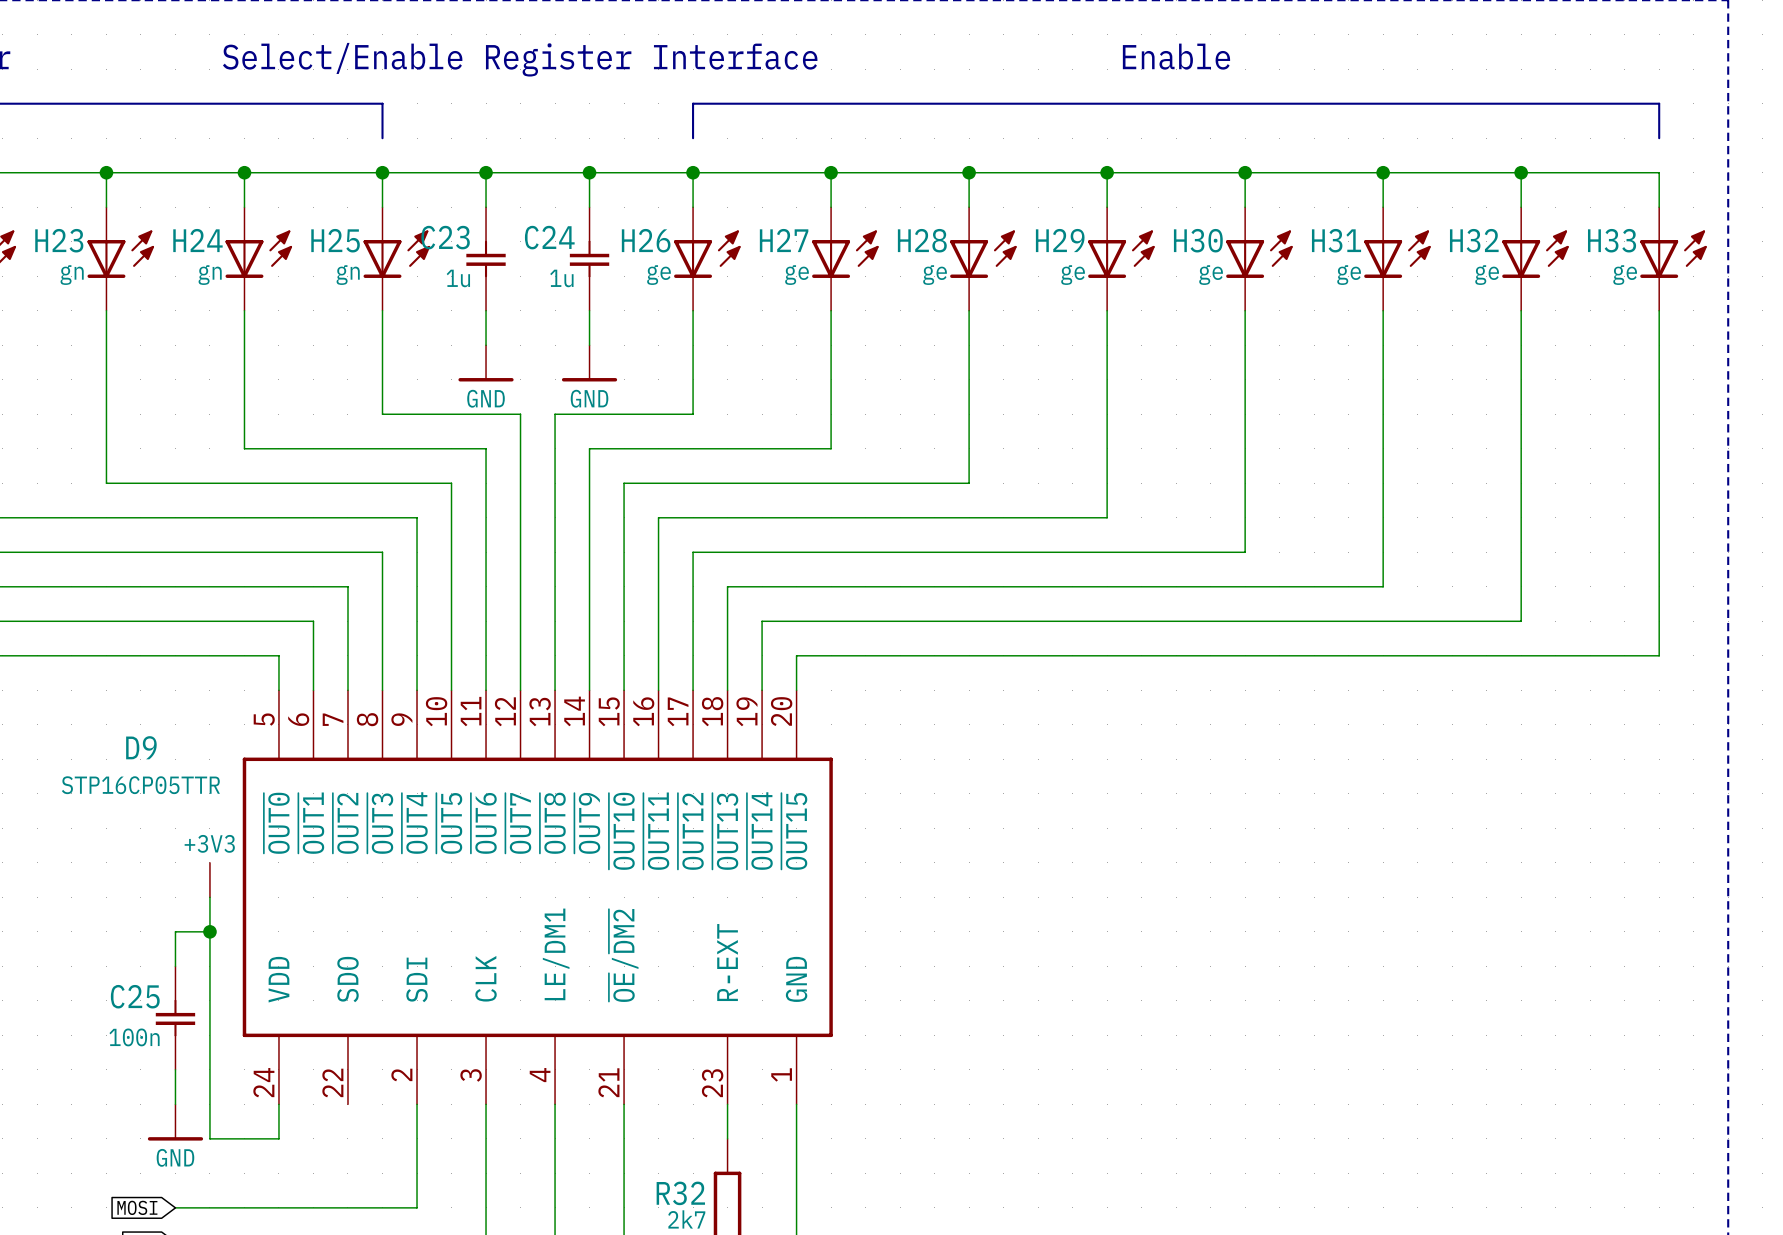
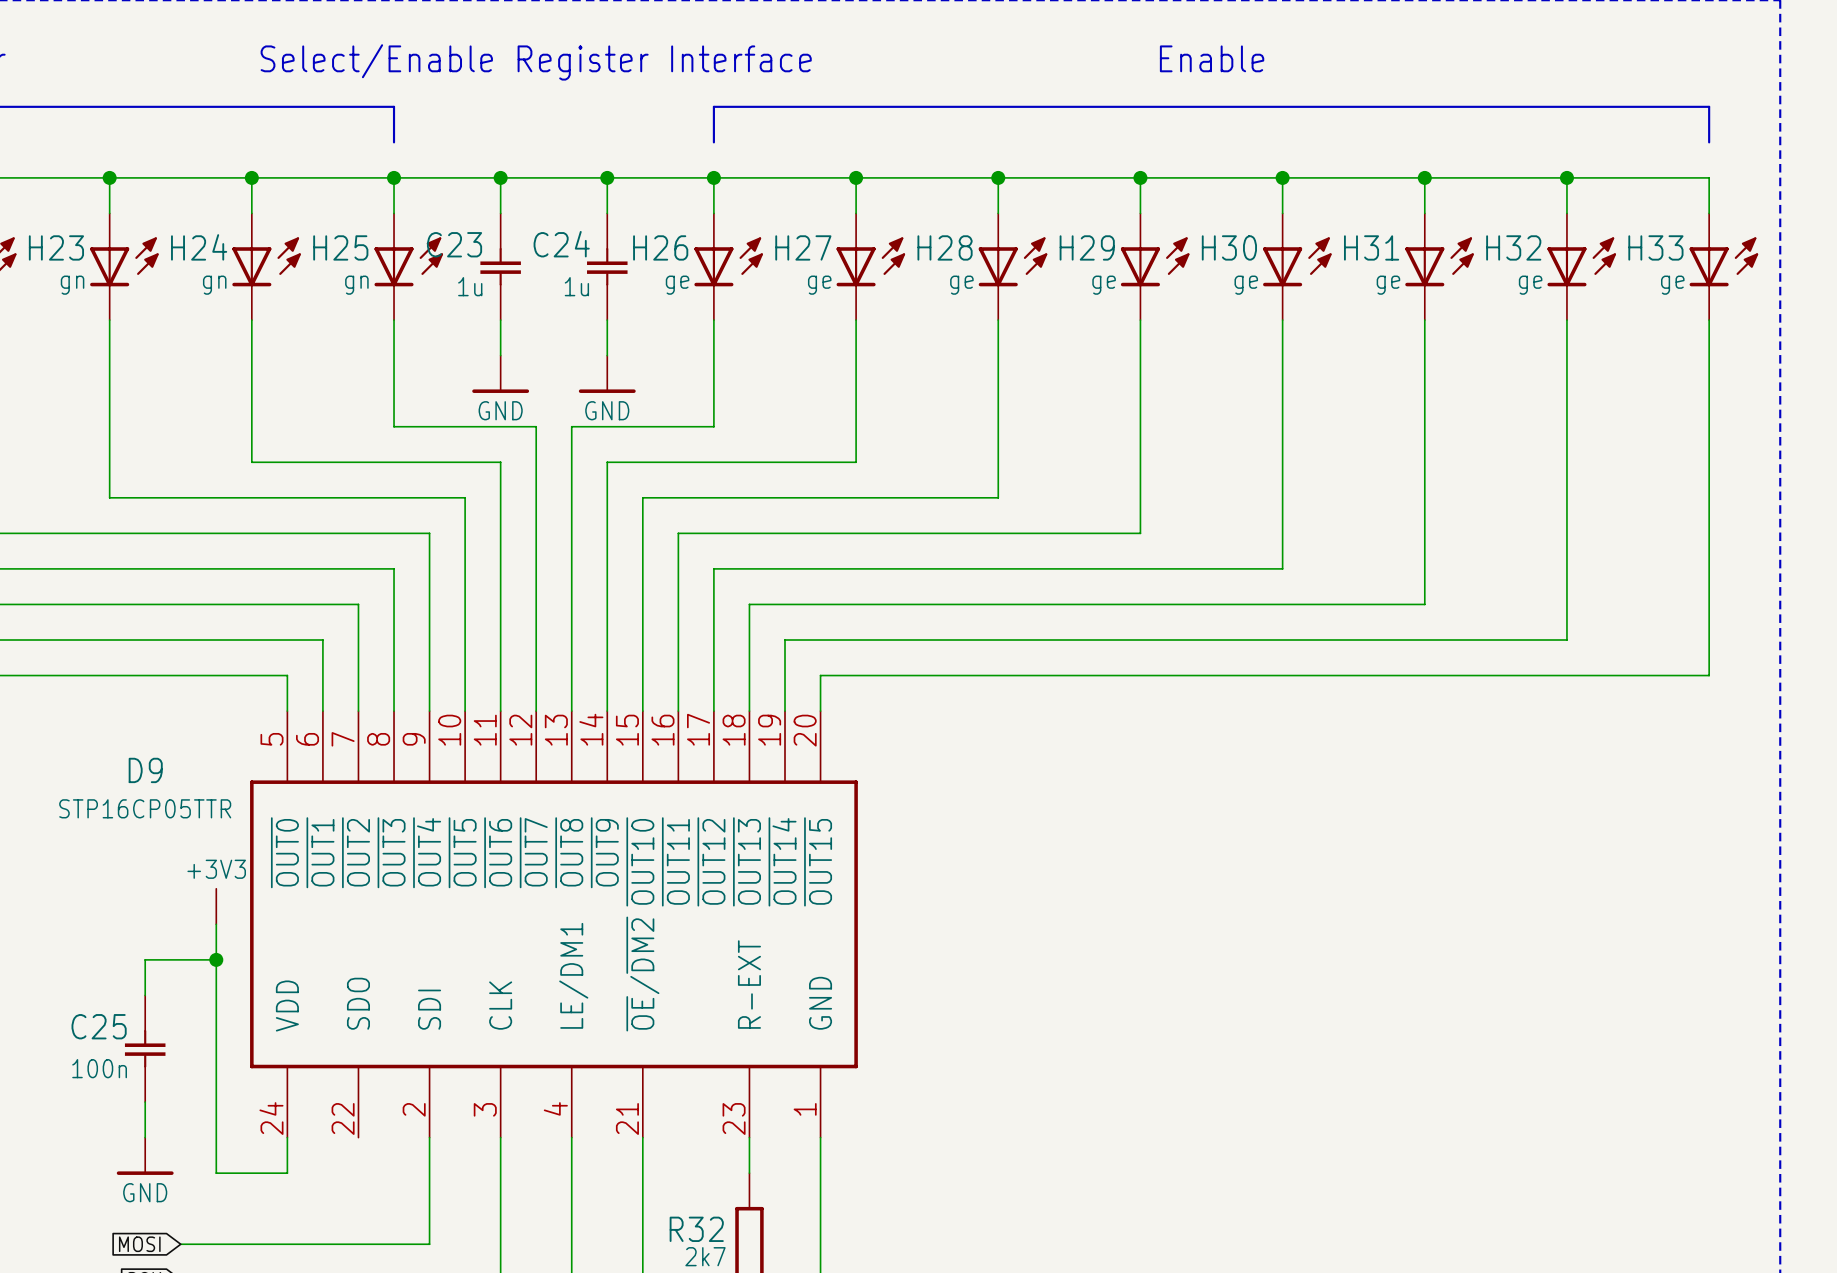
wire: (175, 931) (175, 966) -> (180, 959) (145, 959) (145, 995)
C25 position: (175, 1018) -> (145, 1048)
wire: (175, 1069) (175, 1104) -> (145, 1102) (145, 1137)
power symbol position: GND (175, 1122) -> GND (145, 1156)

